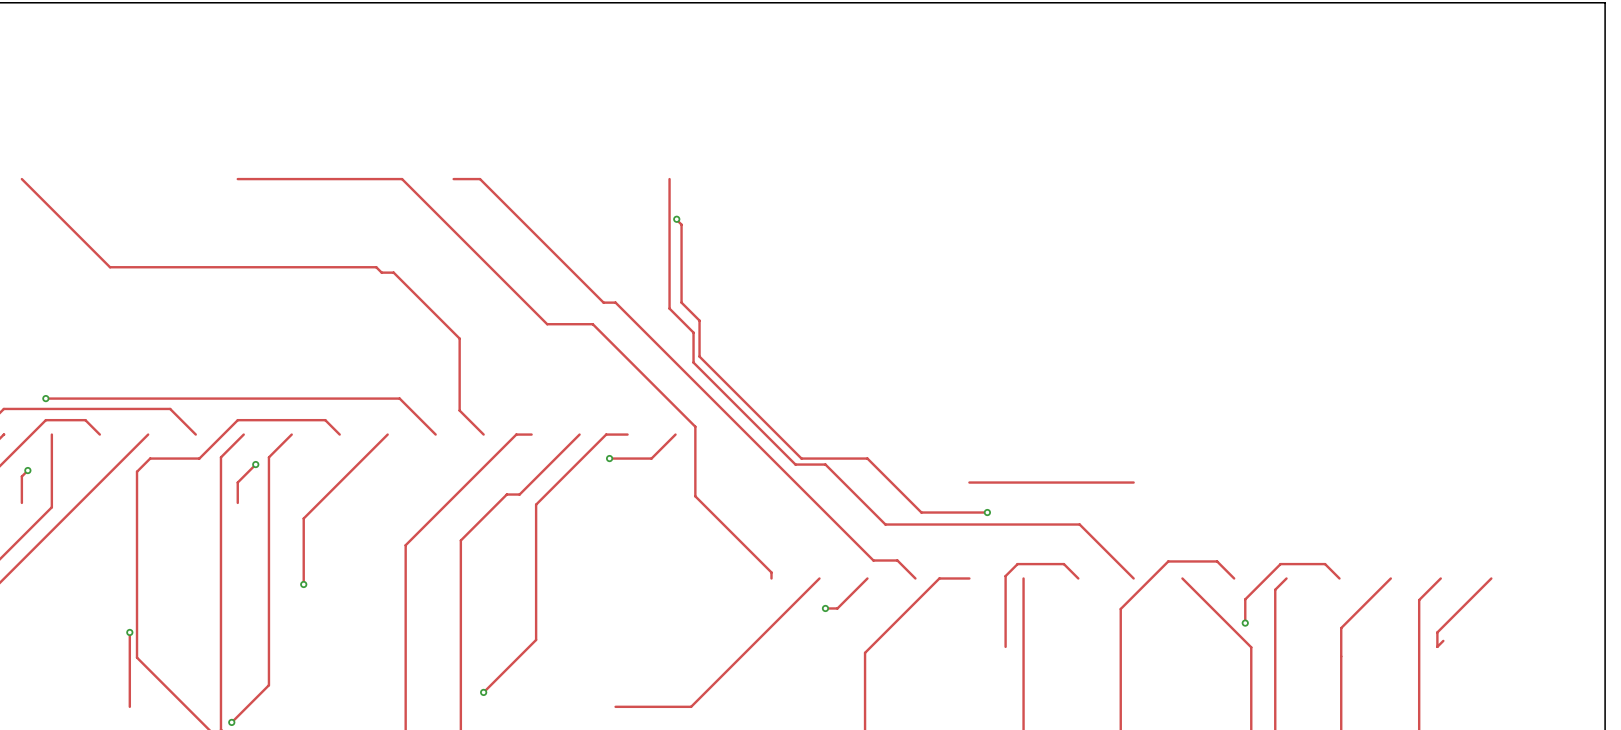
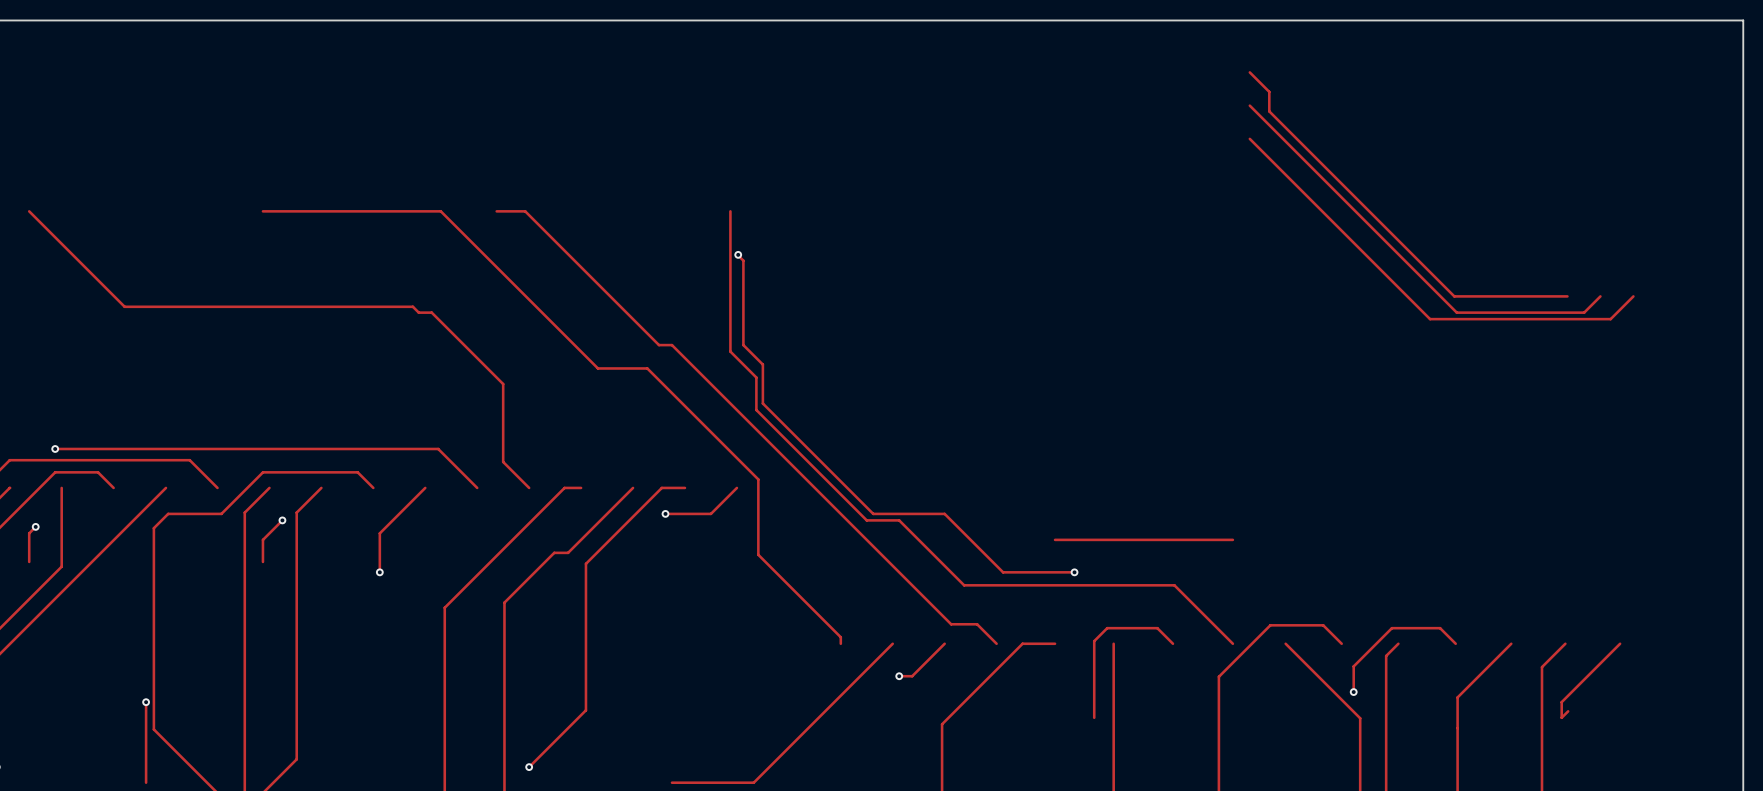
track: none -> (1249, 72) (1269, 91) (1269, 111) (1454, 296) (1567, 296)
track: none -> (1249, 105) (1456, 312) (1584, 312) (1600, 296)
track: none -> (1249, 138) (1430, 319) (1610, 319) (1633, 296)
track: (345, 476) (303, 518) (303, 584) -> (379, 533) (379, 572)
via: none -> (379, 572)
via: (303, 584) -> none

